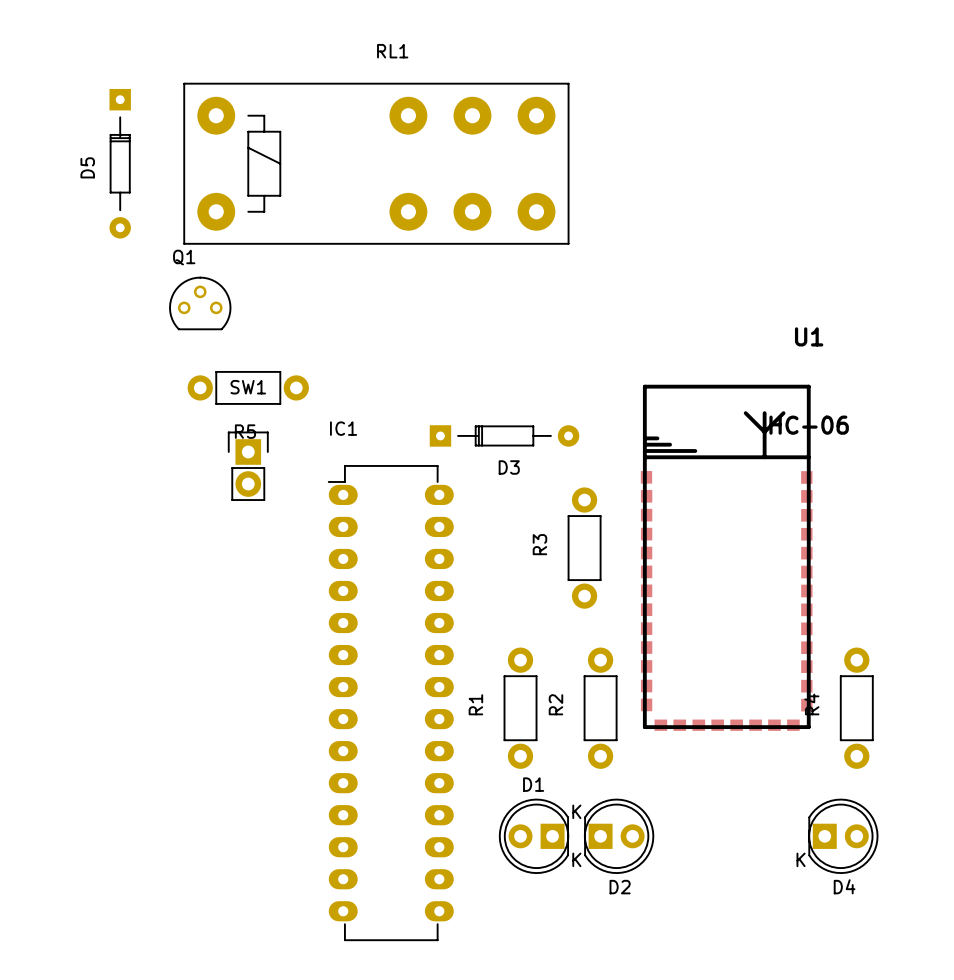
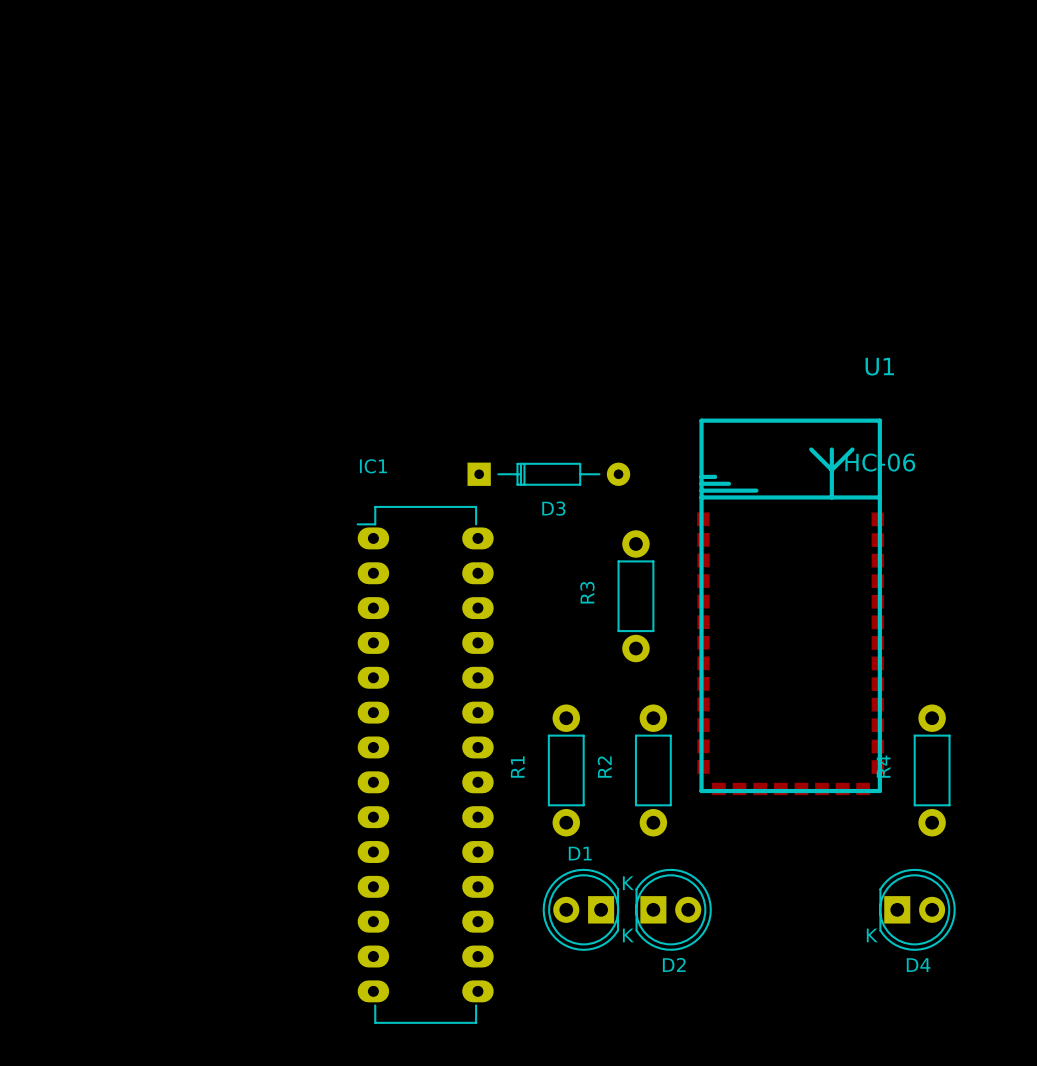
D5: (120, 163) -> none
RL1: (376, 163) -> none
Q1: (200, 303) -> none
R5: (248, 387) -> none
SW1: (248, 466) -> none

